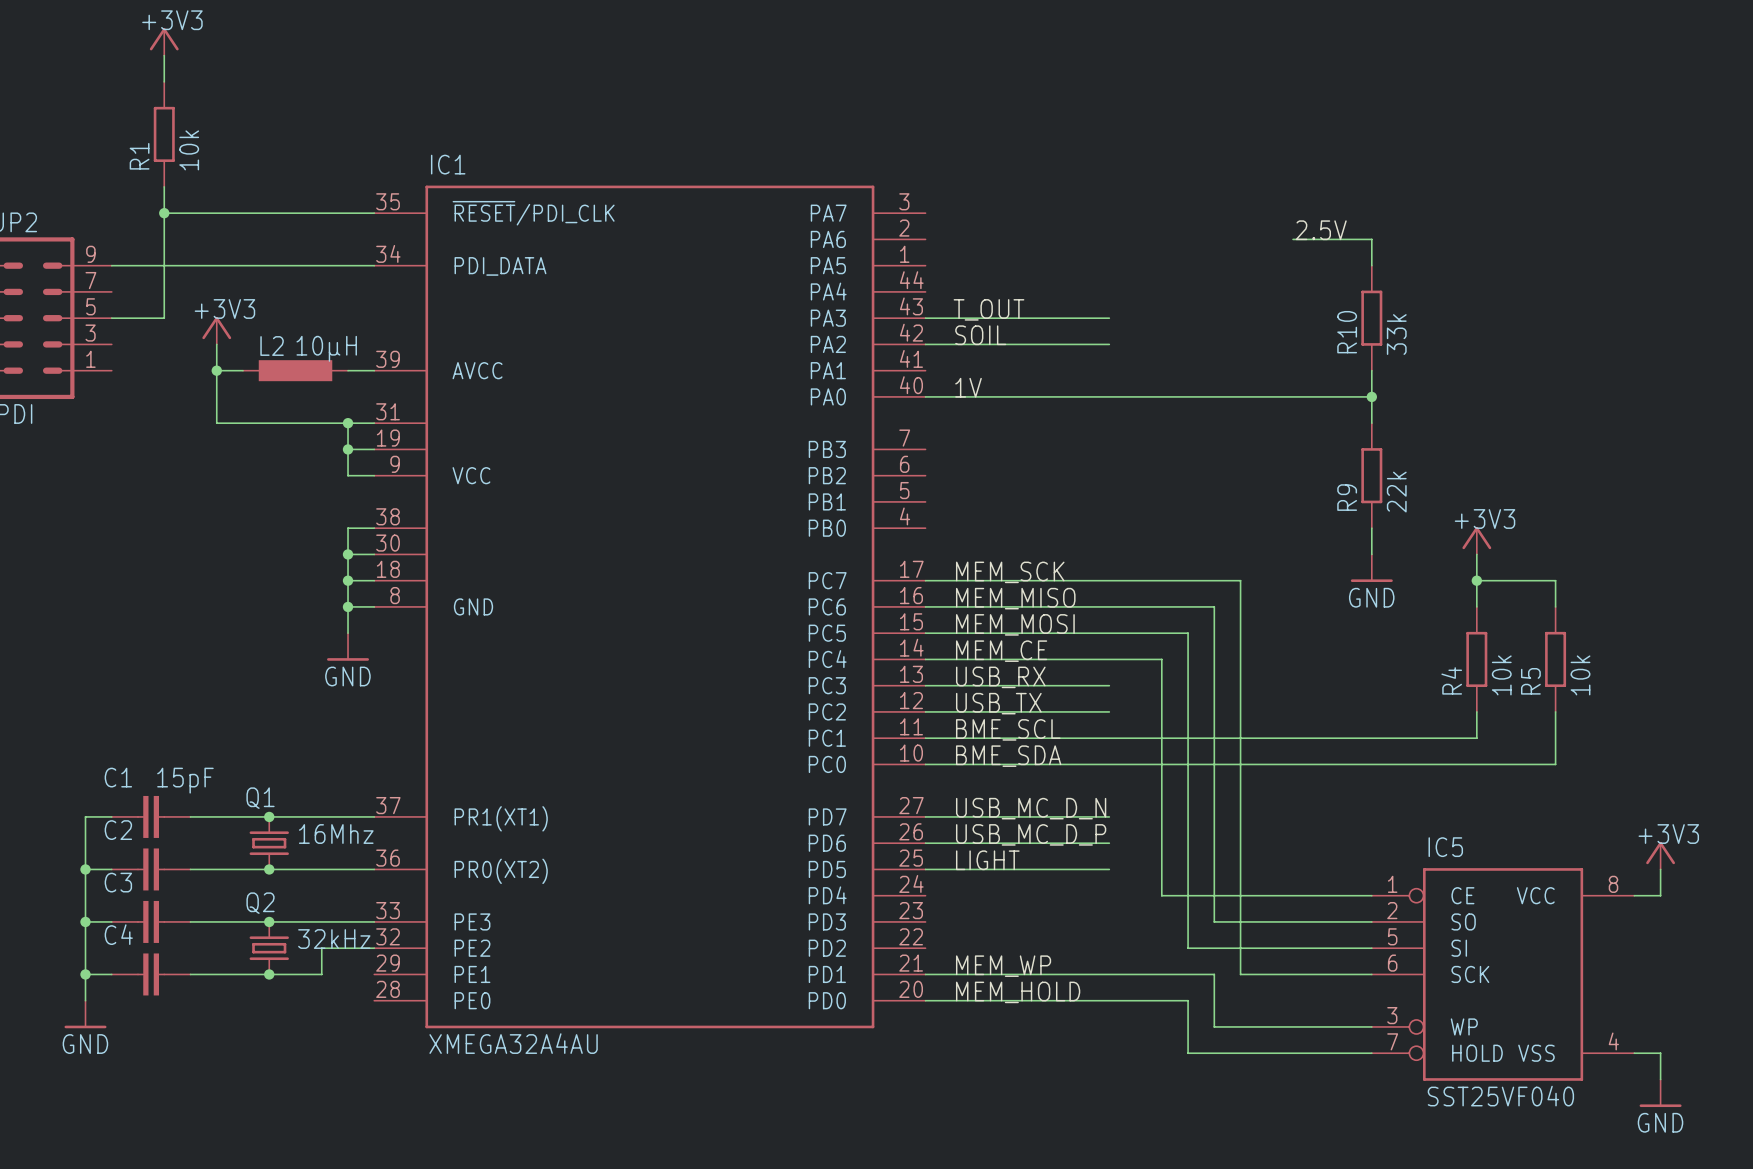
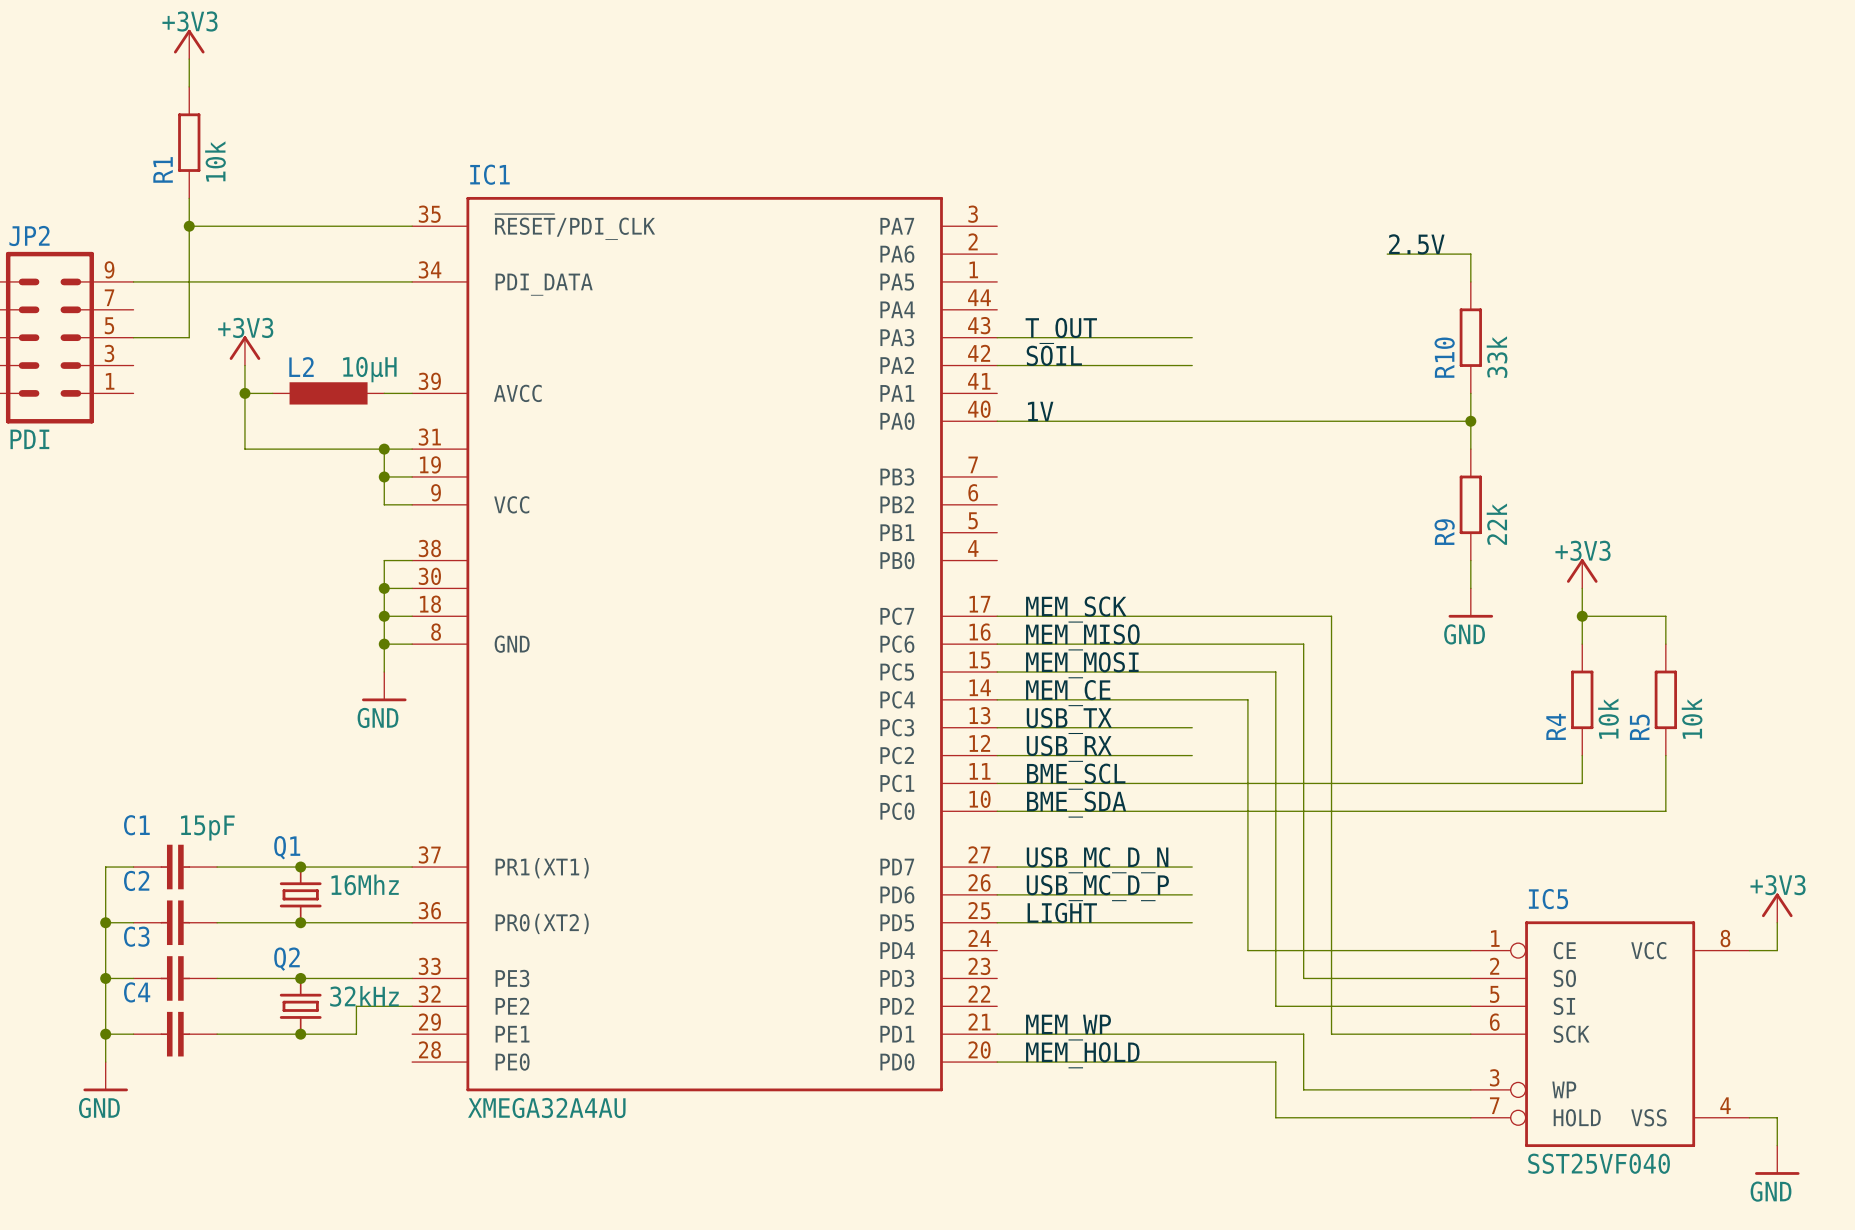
label: USB_RX (1000, 677) -> USB_TX (1069, 720)
label: USB_TX (998, 703) -> USB_RX (1069, 748)

